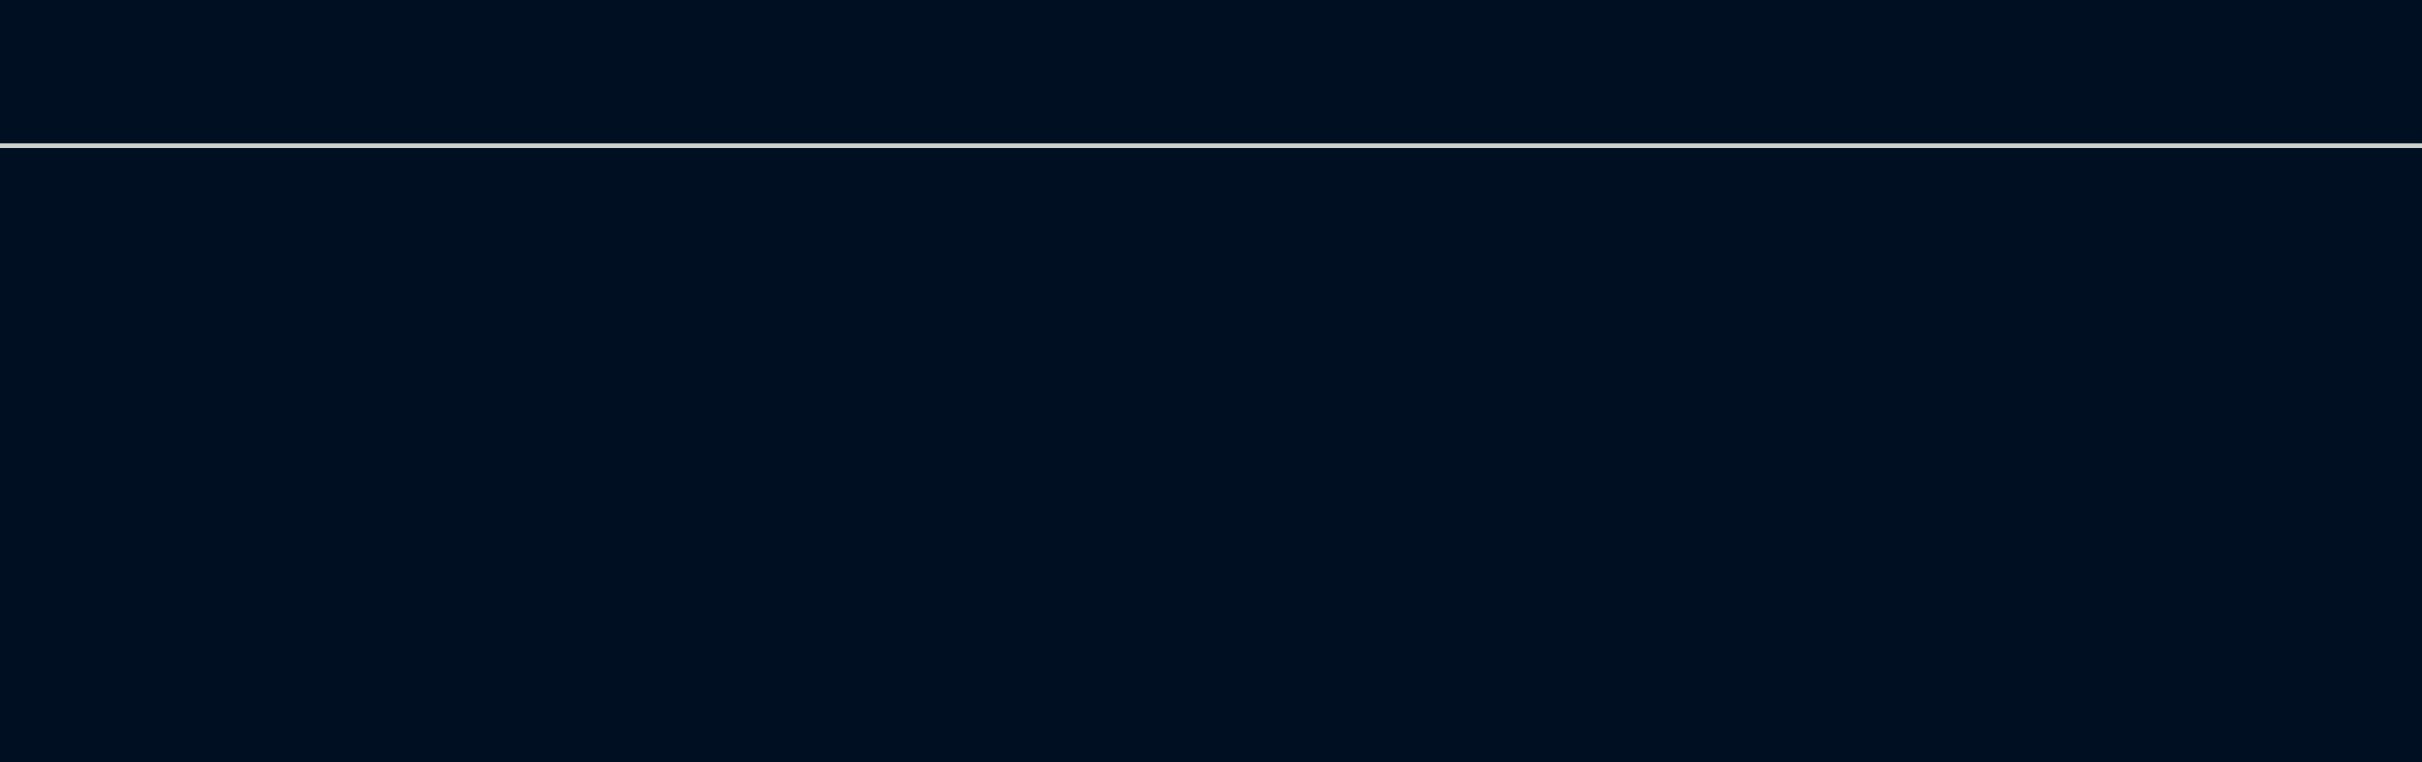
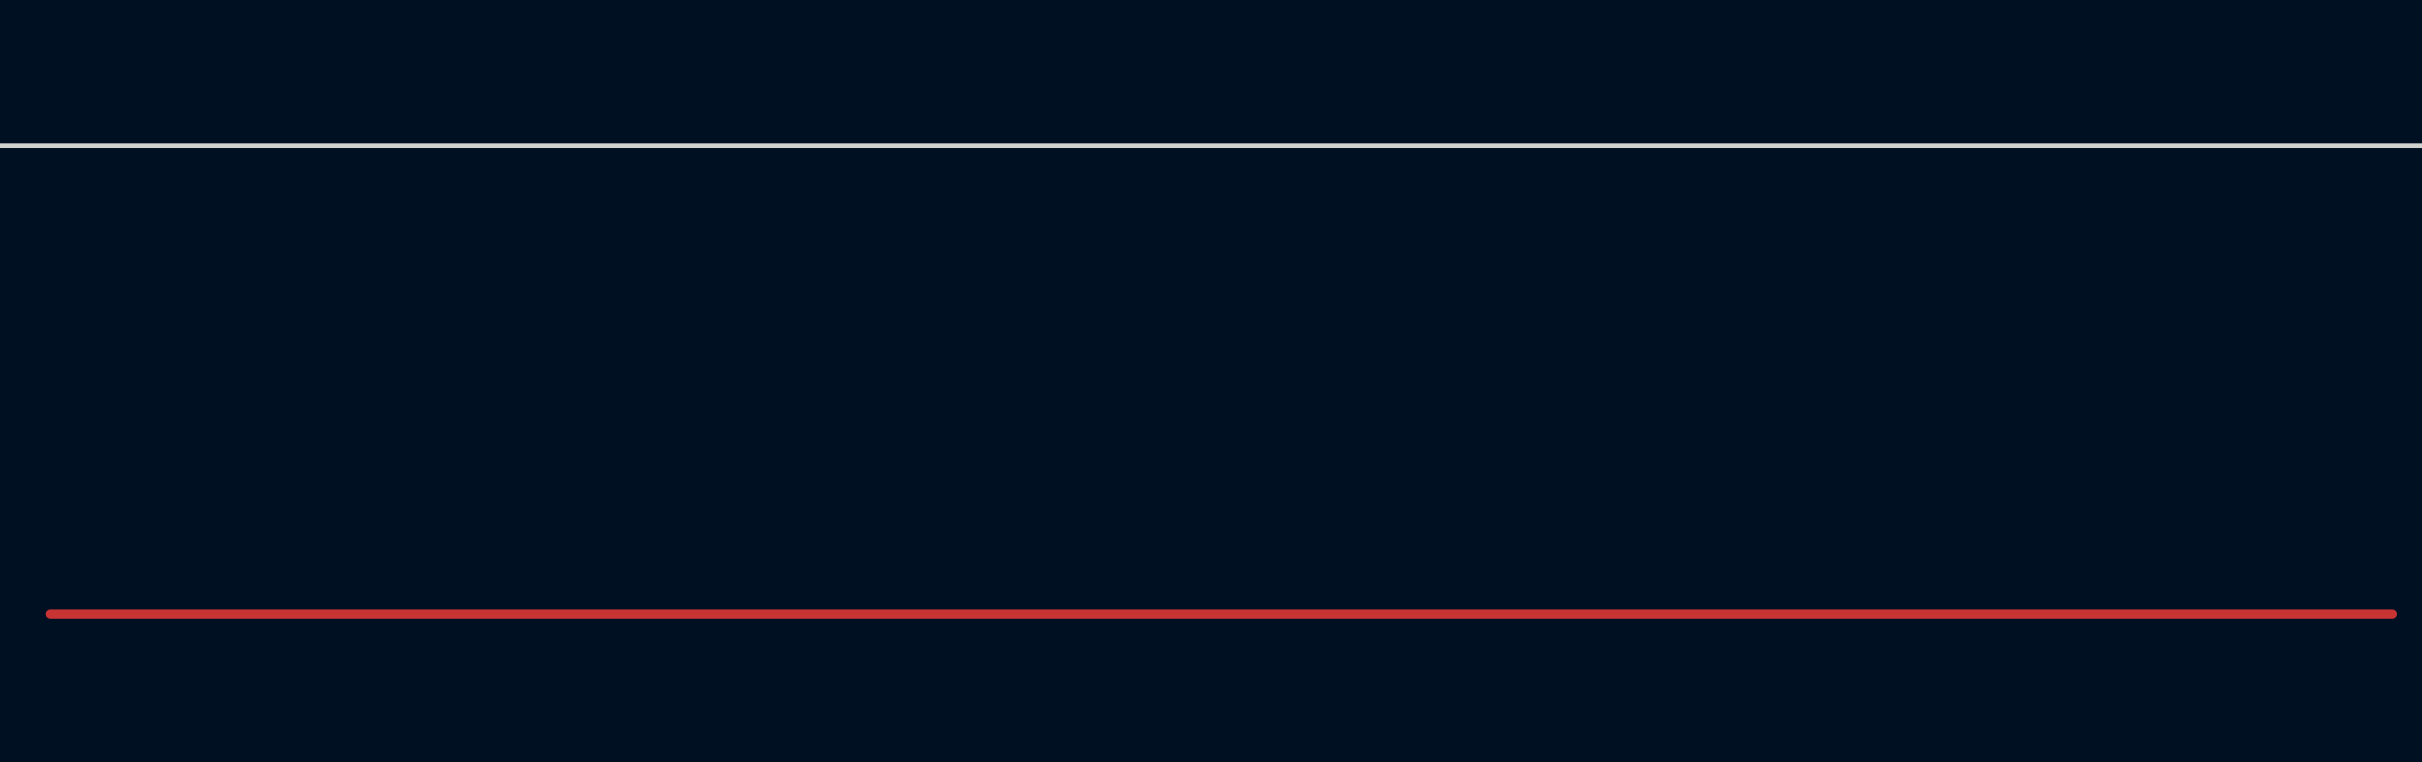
track: none -> (50, 614) (2392, 614)

